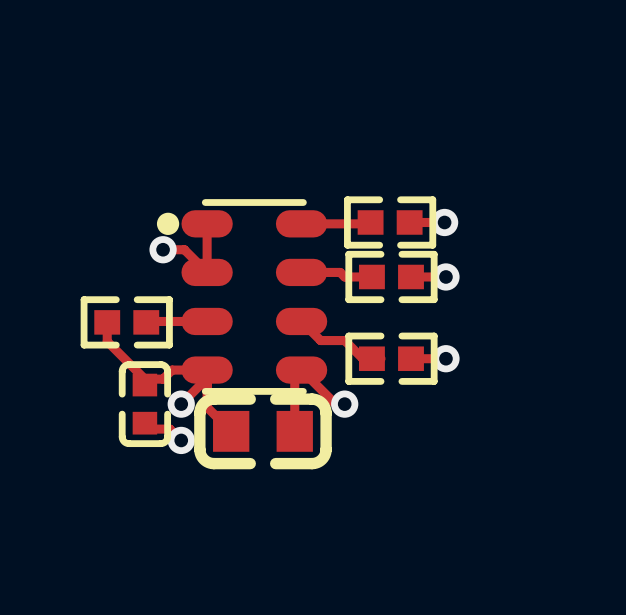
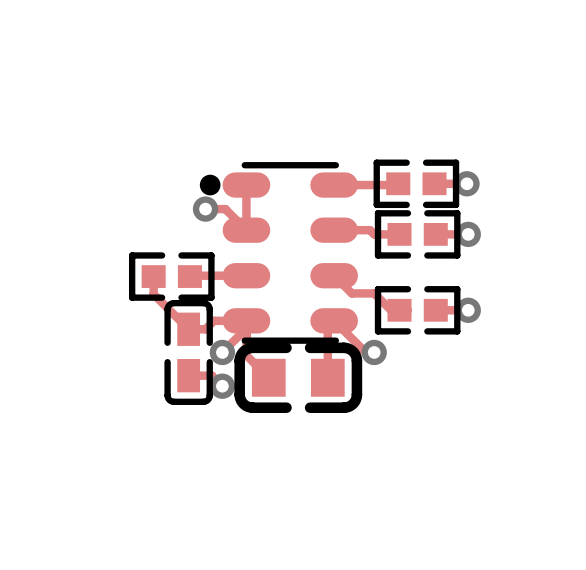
part footprint: [118, 361, 172, 448] -> [164, 299, 213, 405]

